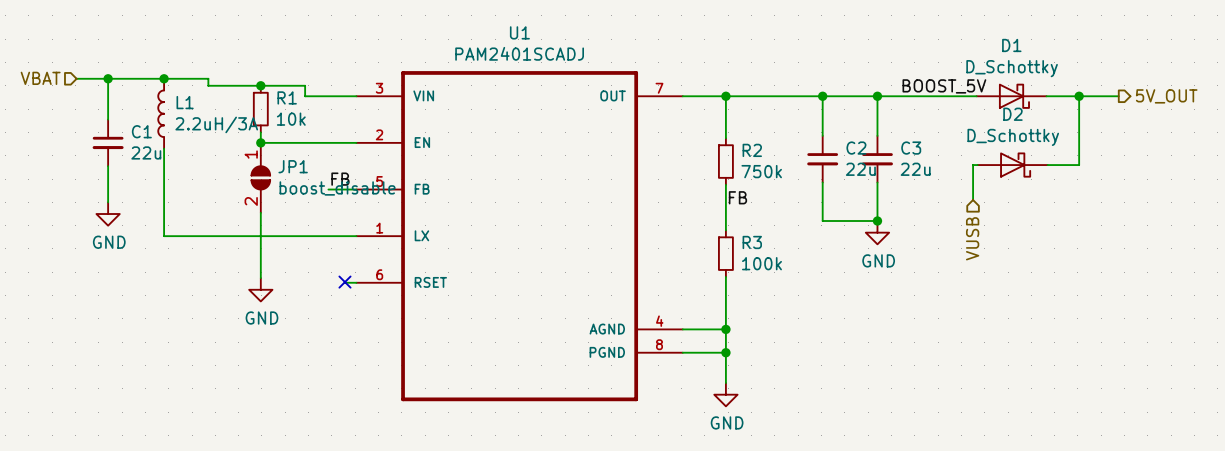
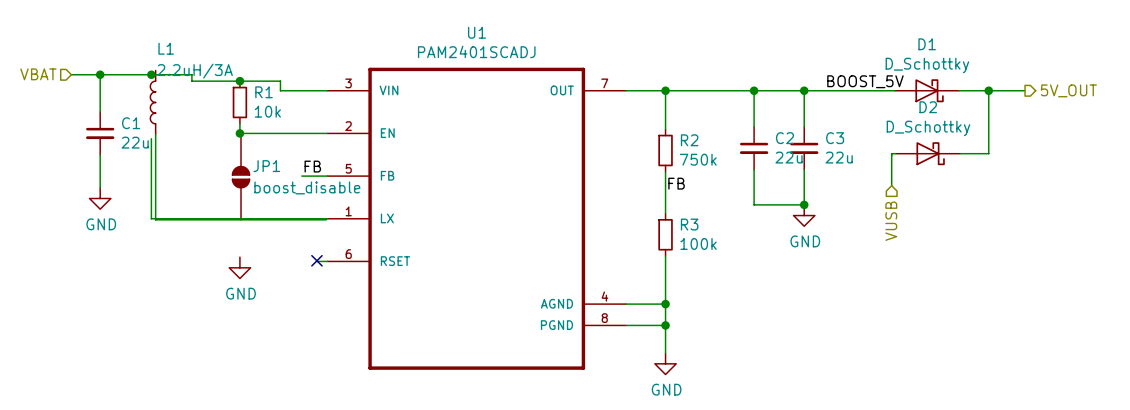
L1 symbol: [158, 78, 165, 149] -> [150, 70, 156, 135]
L1 name position: L1 (185, 102) -> L1 (166, 48)
L1 value position: 2.2uH/3A (216, 124) -> 2.2uH/3A (195, 71)
JP1 symbol: [251, 142, 271, 213] -> [231, 134, 251, 220]
wire: none -> (155, 134) (155, 219) (326, 219)
wire: (260, 212) (260, 278) -> none

